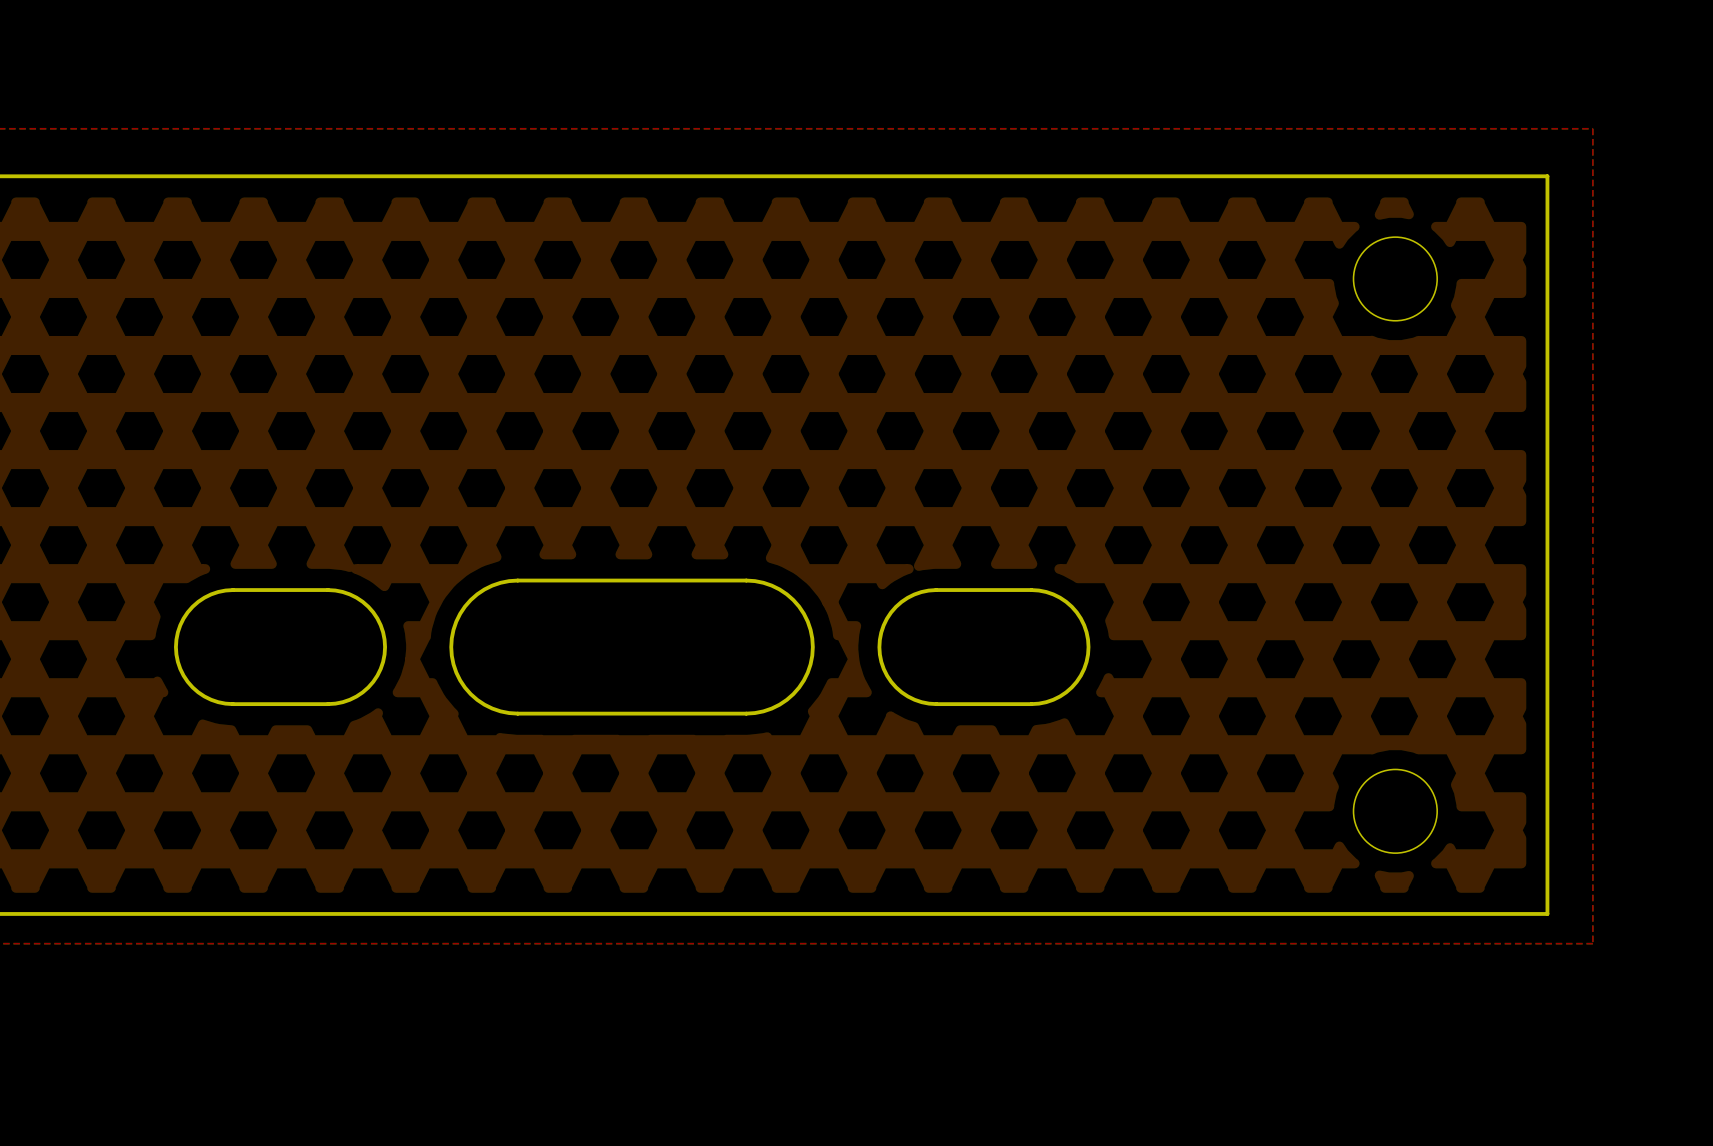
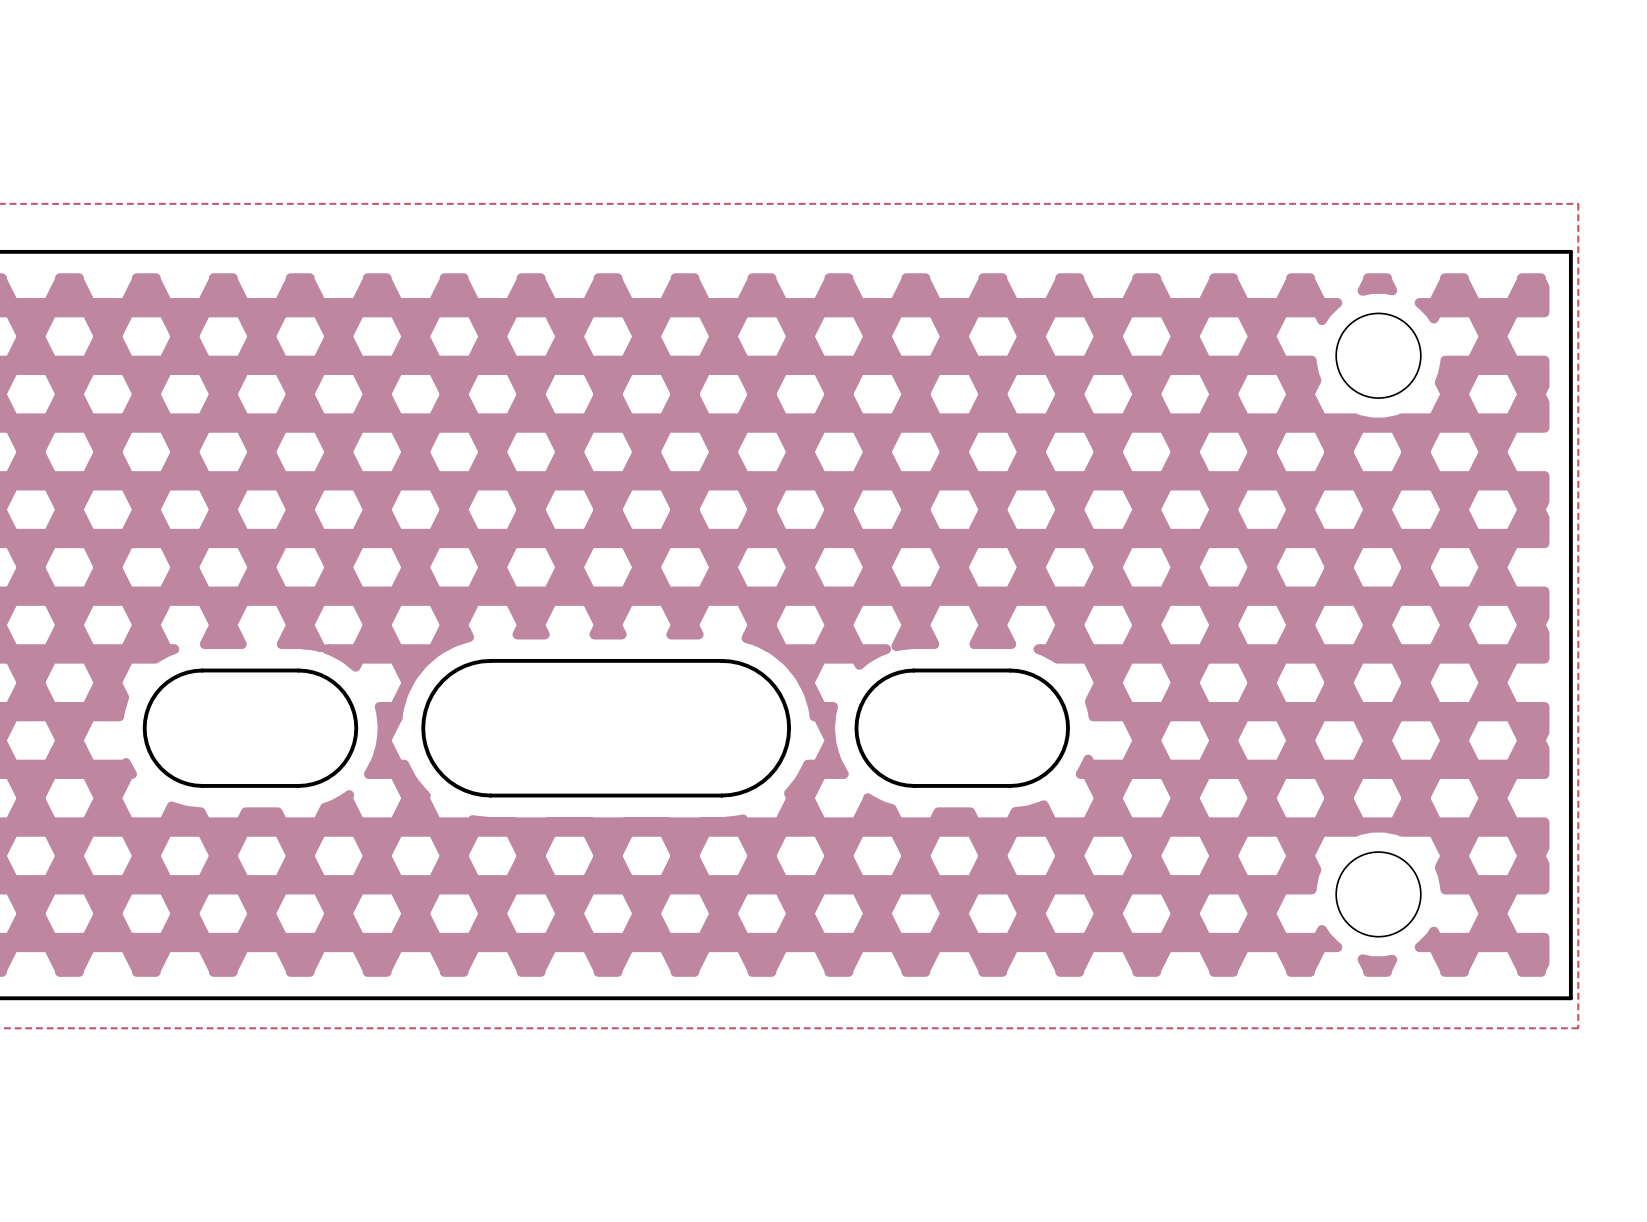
board edge: (1547, 176) (1547, 913) -> (1532, 251) (1570, 251) (1570, 998) (1532, 998)

